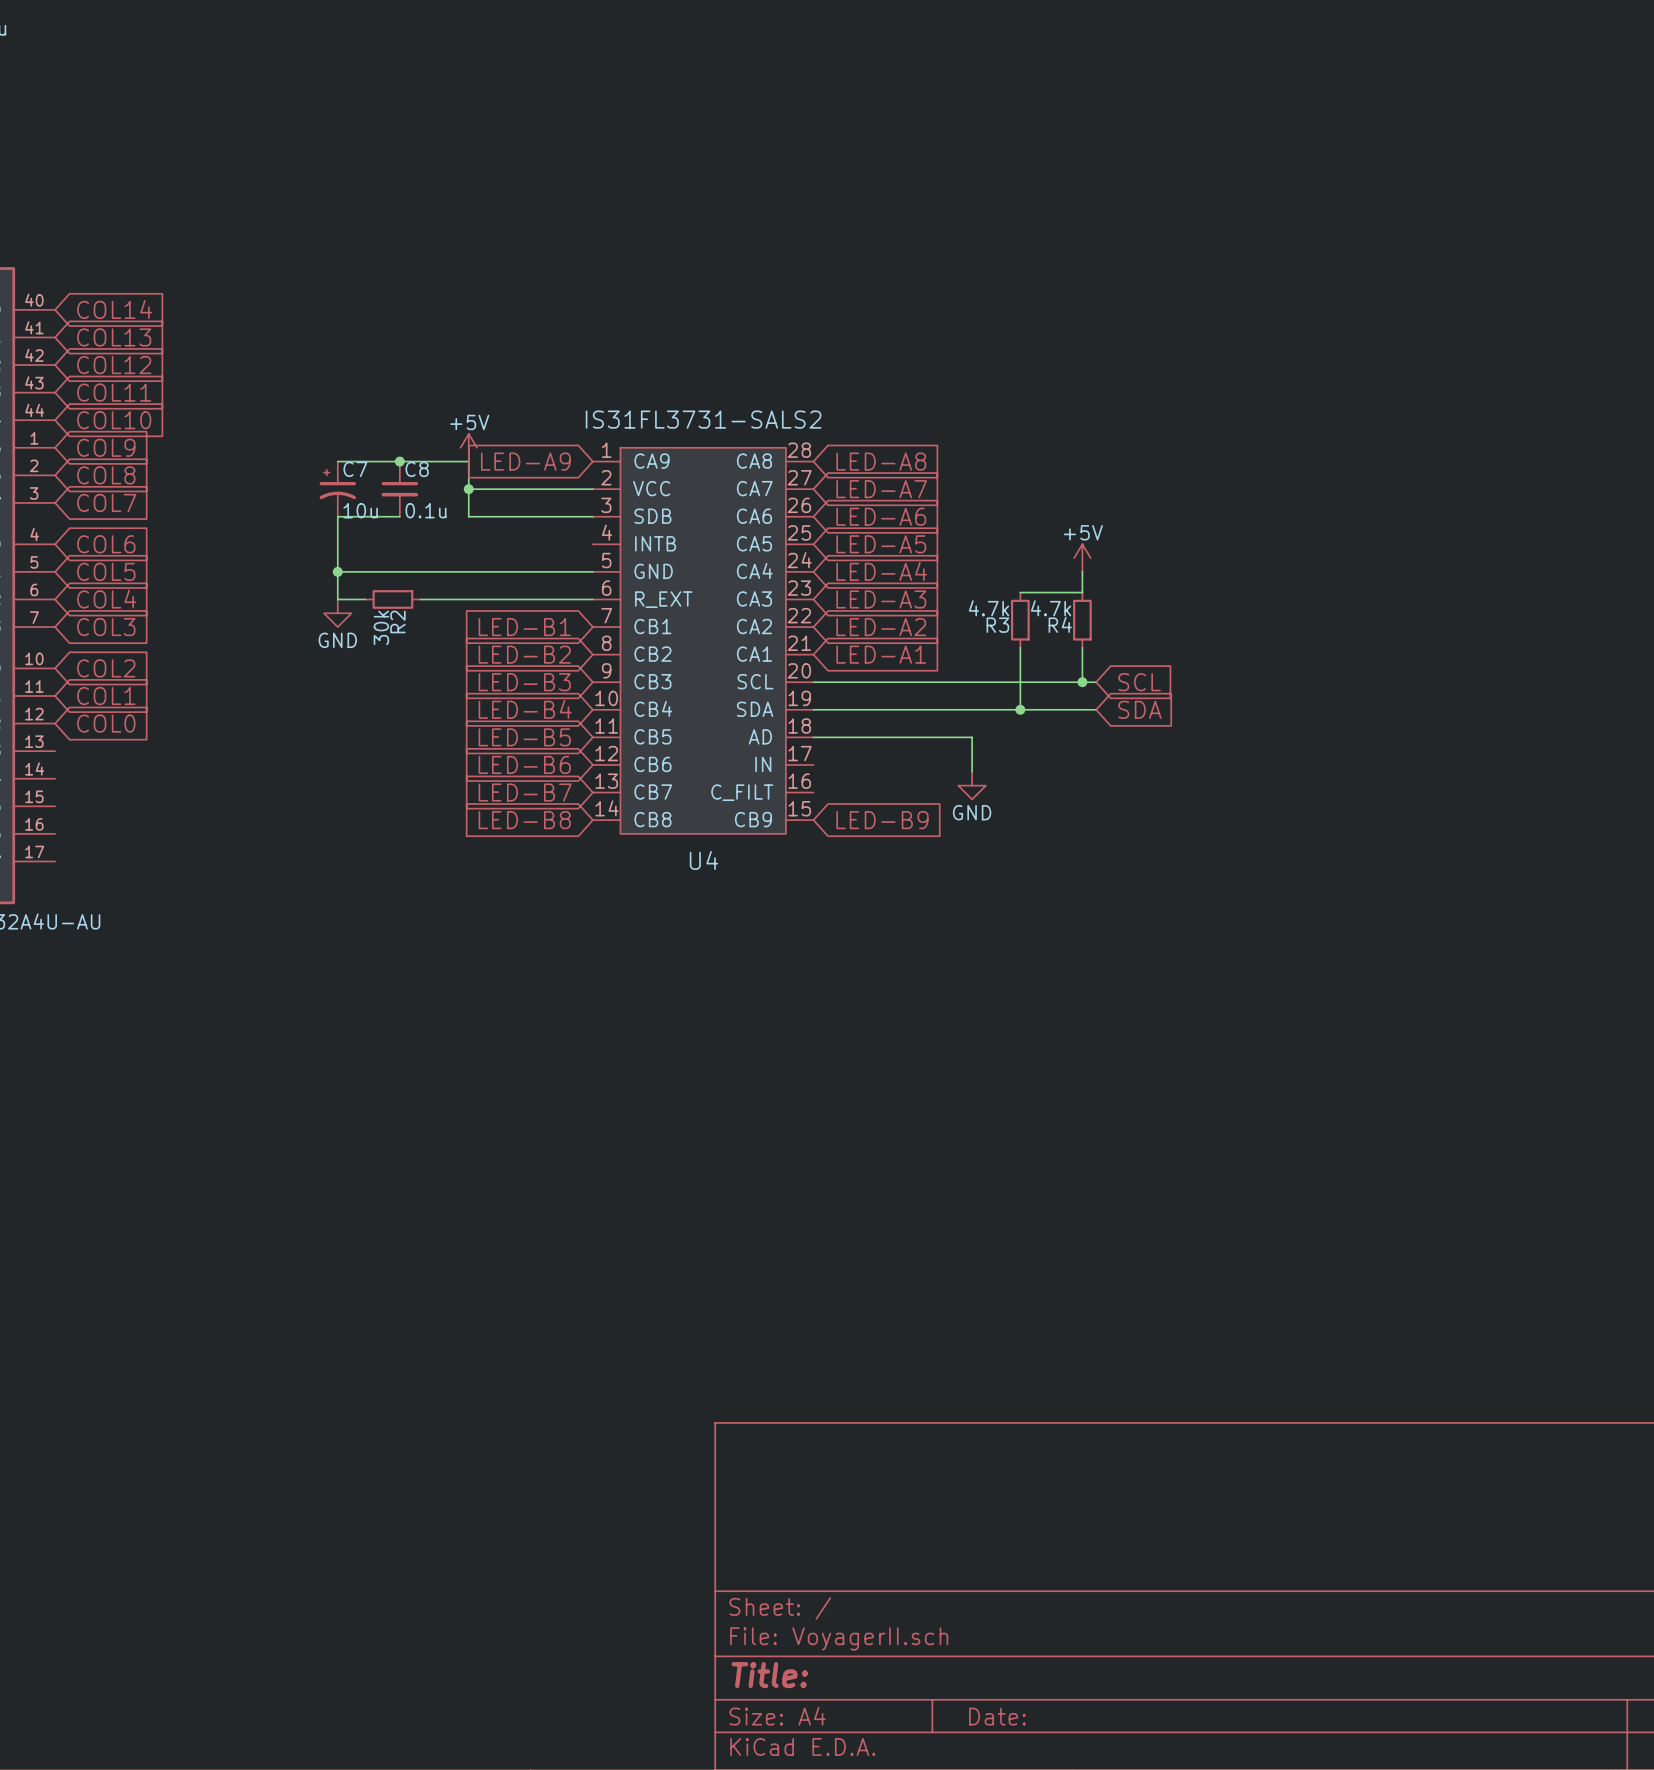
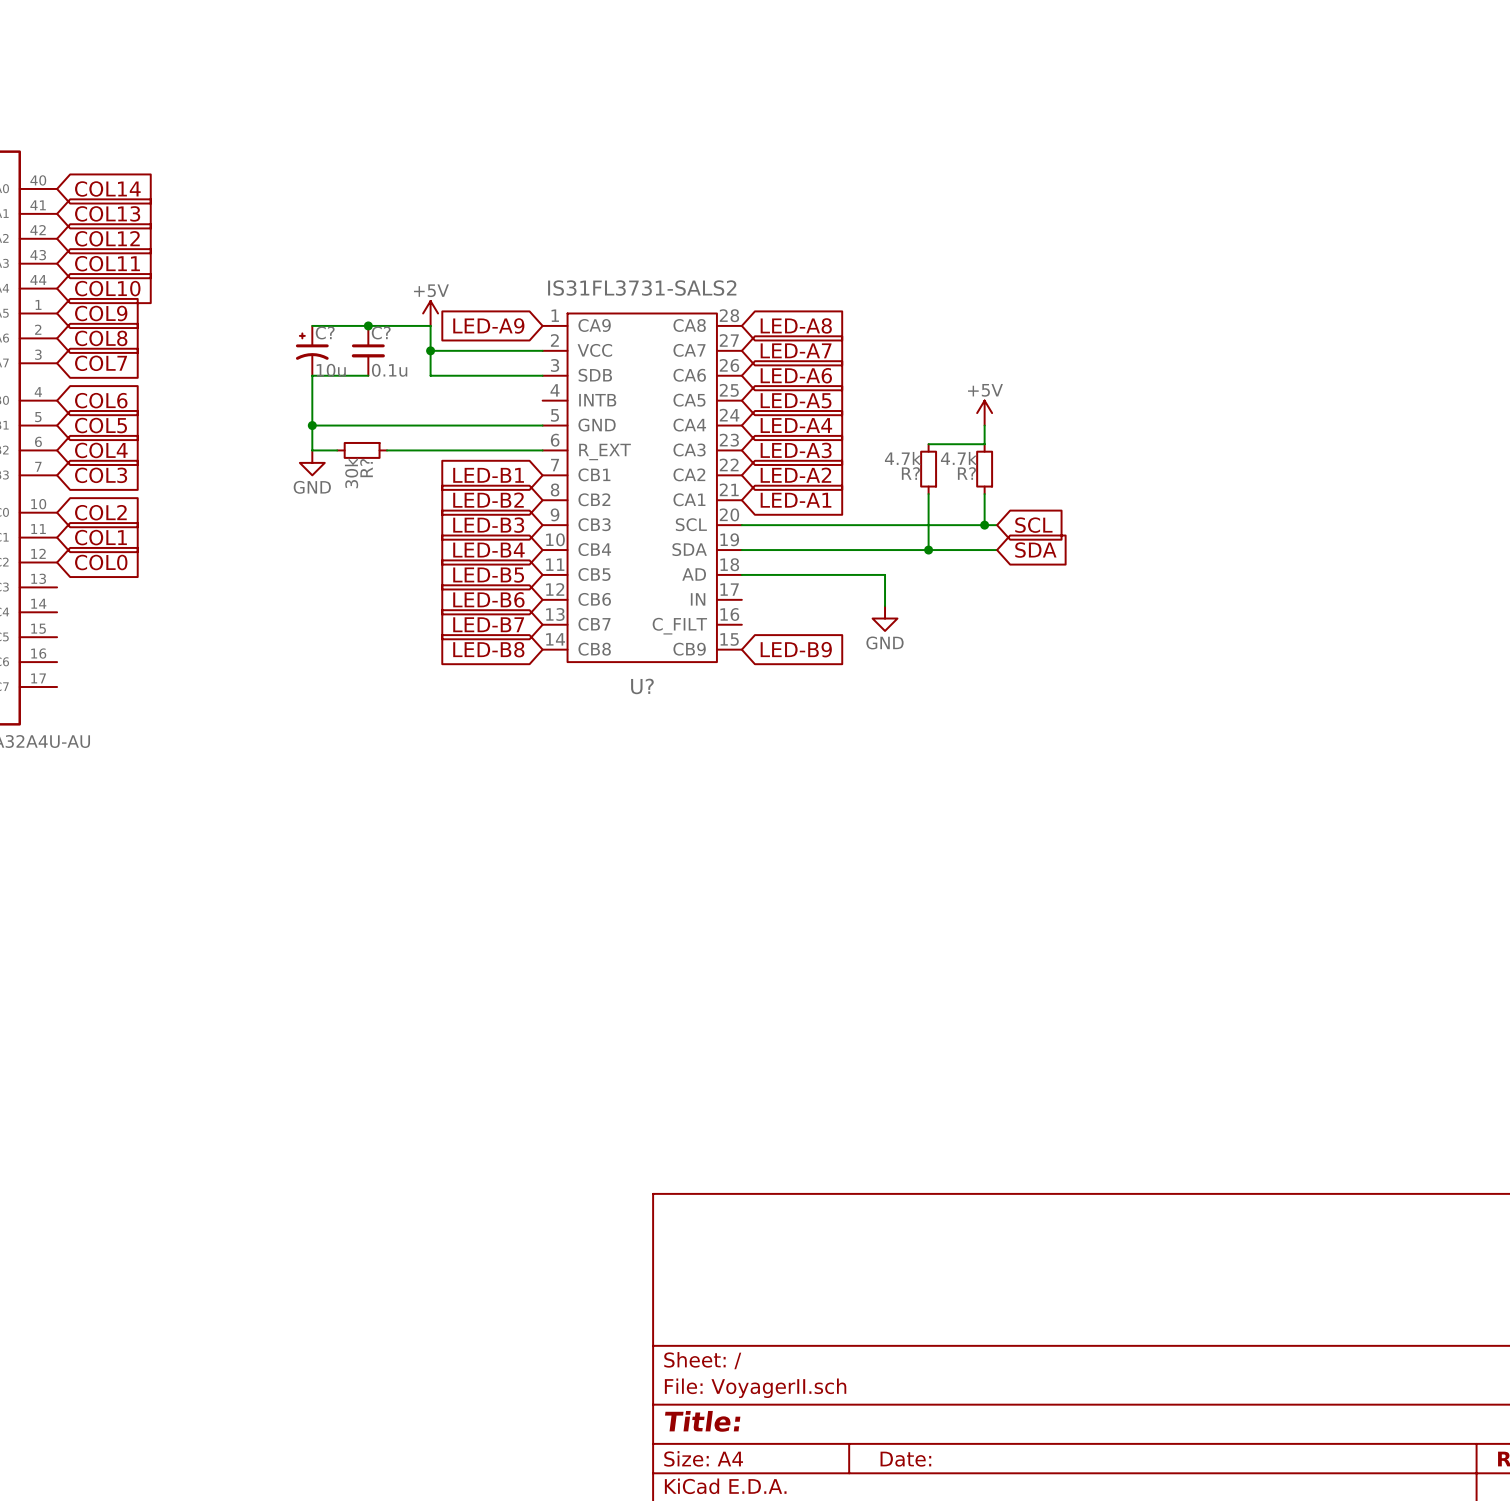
C7 name: C7 (355, 469) -> C? (325, 332)
C8 name: C8 (417, 469) -> C? (381, 332)
R2 name: R2 (397, 621) -> R? (366, 468)
R4 name: R4 (1060, 624) -> R? (966, 473)
R3 name: R3 (997, 625) -> R? (910, 473)
U4 name: U4 (703, 860) -> U? (642, 686)

